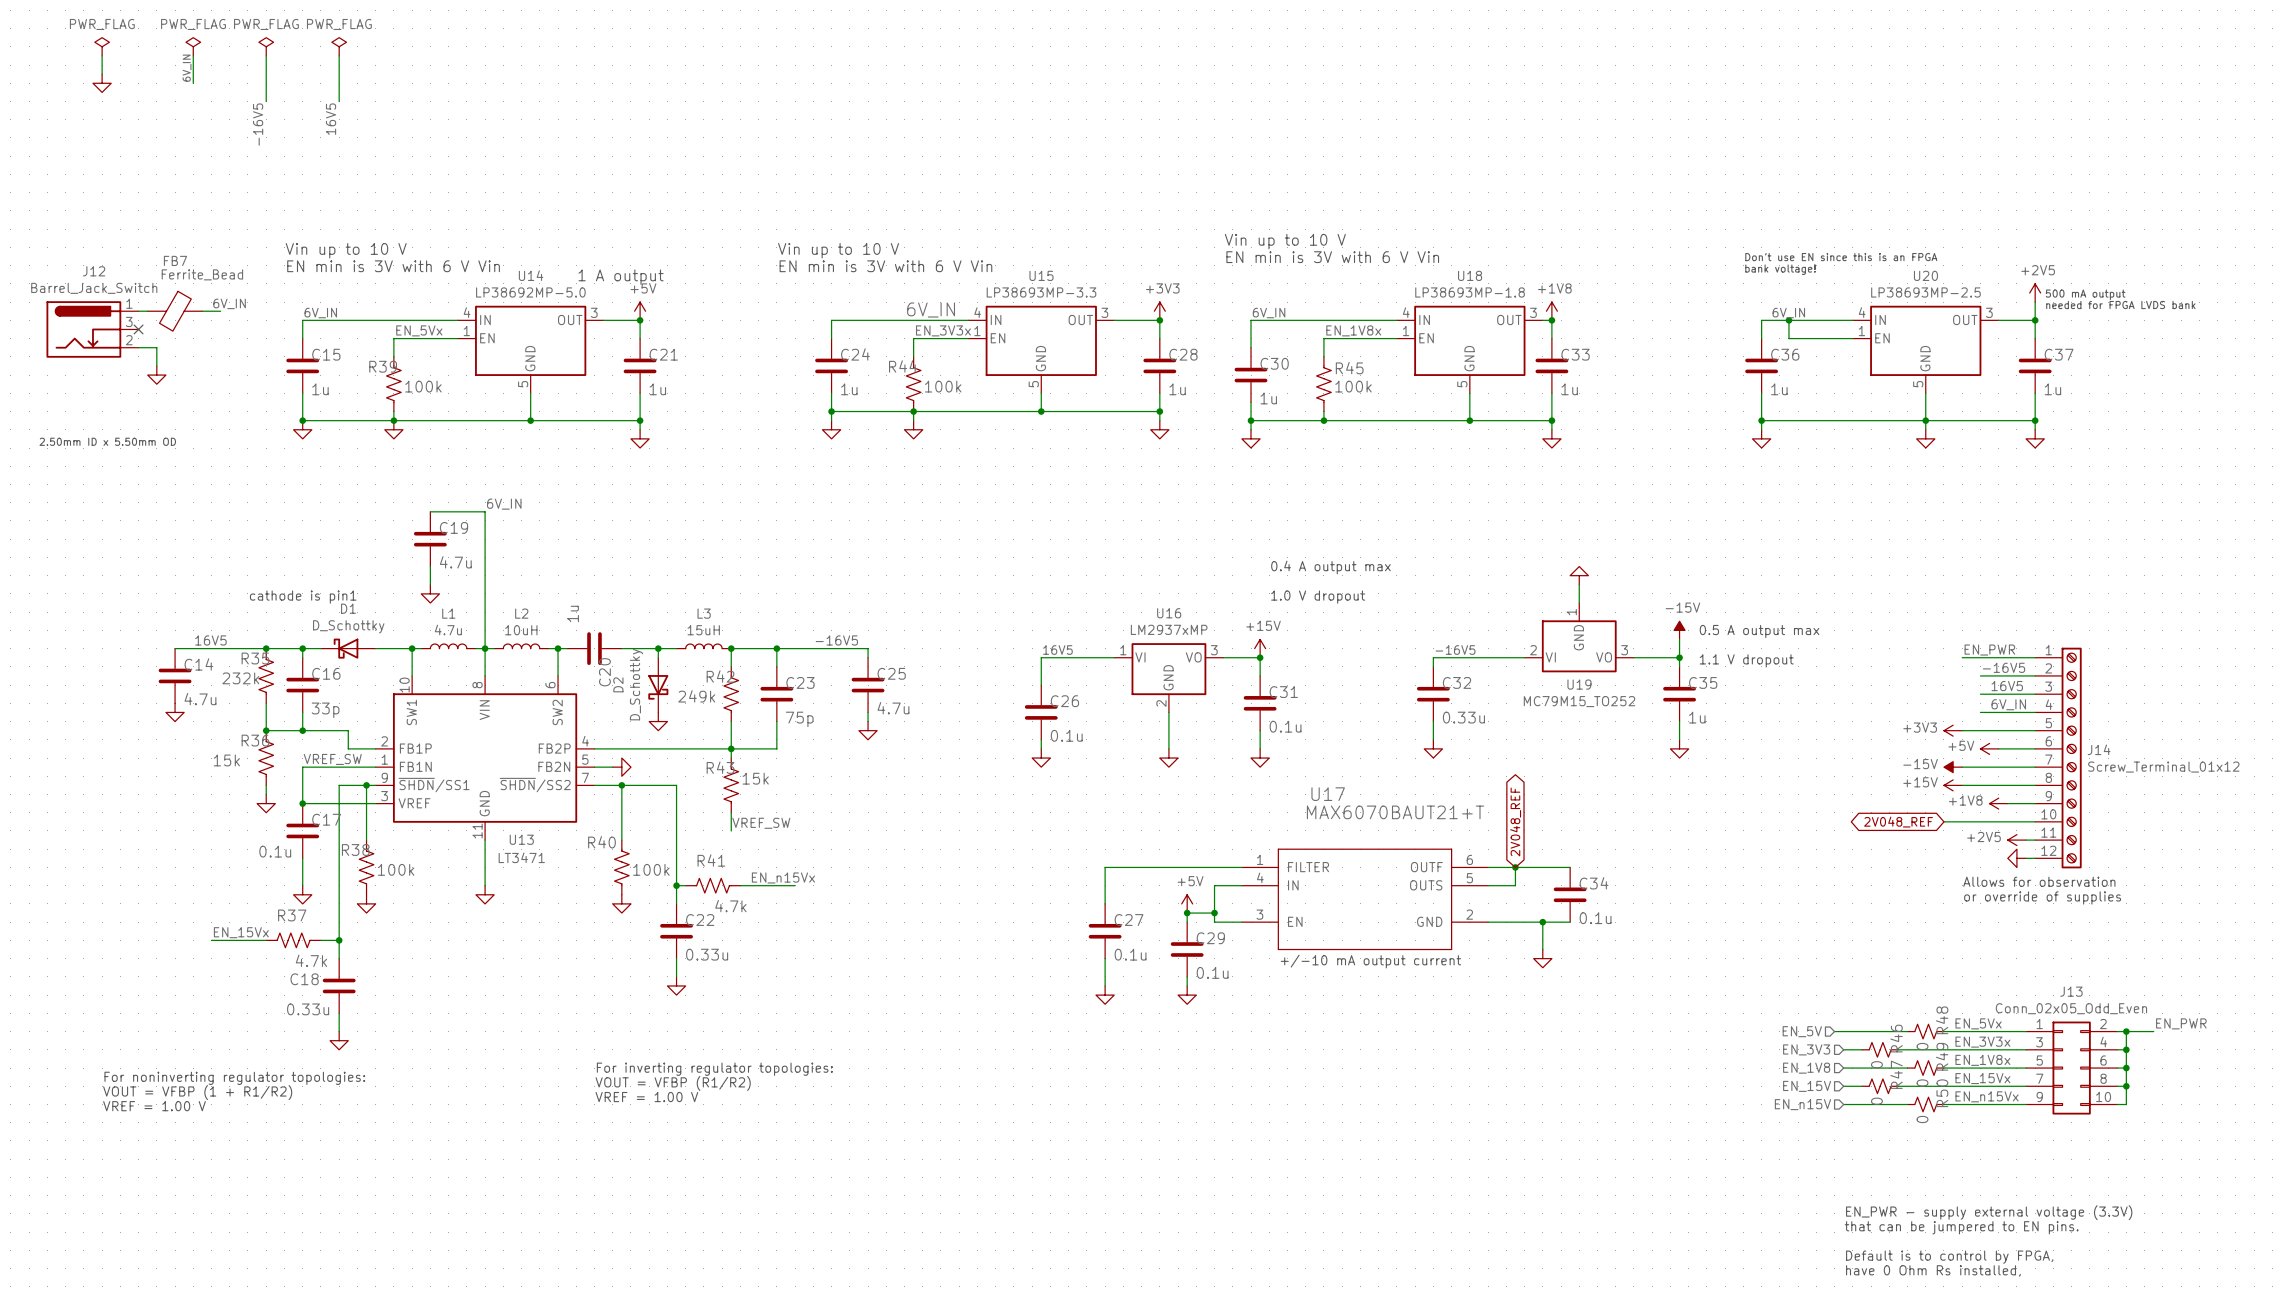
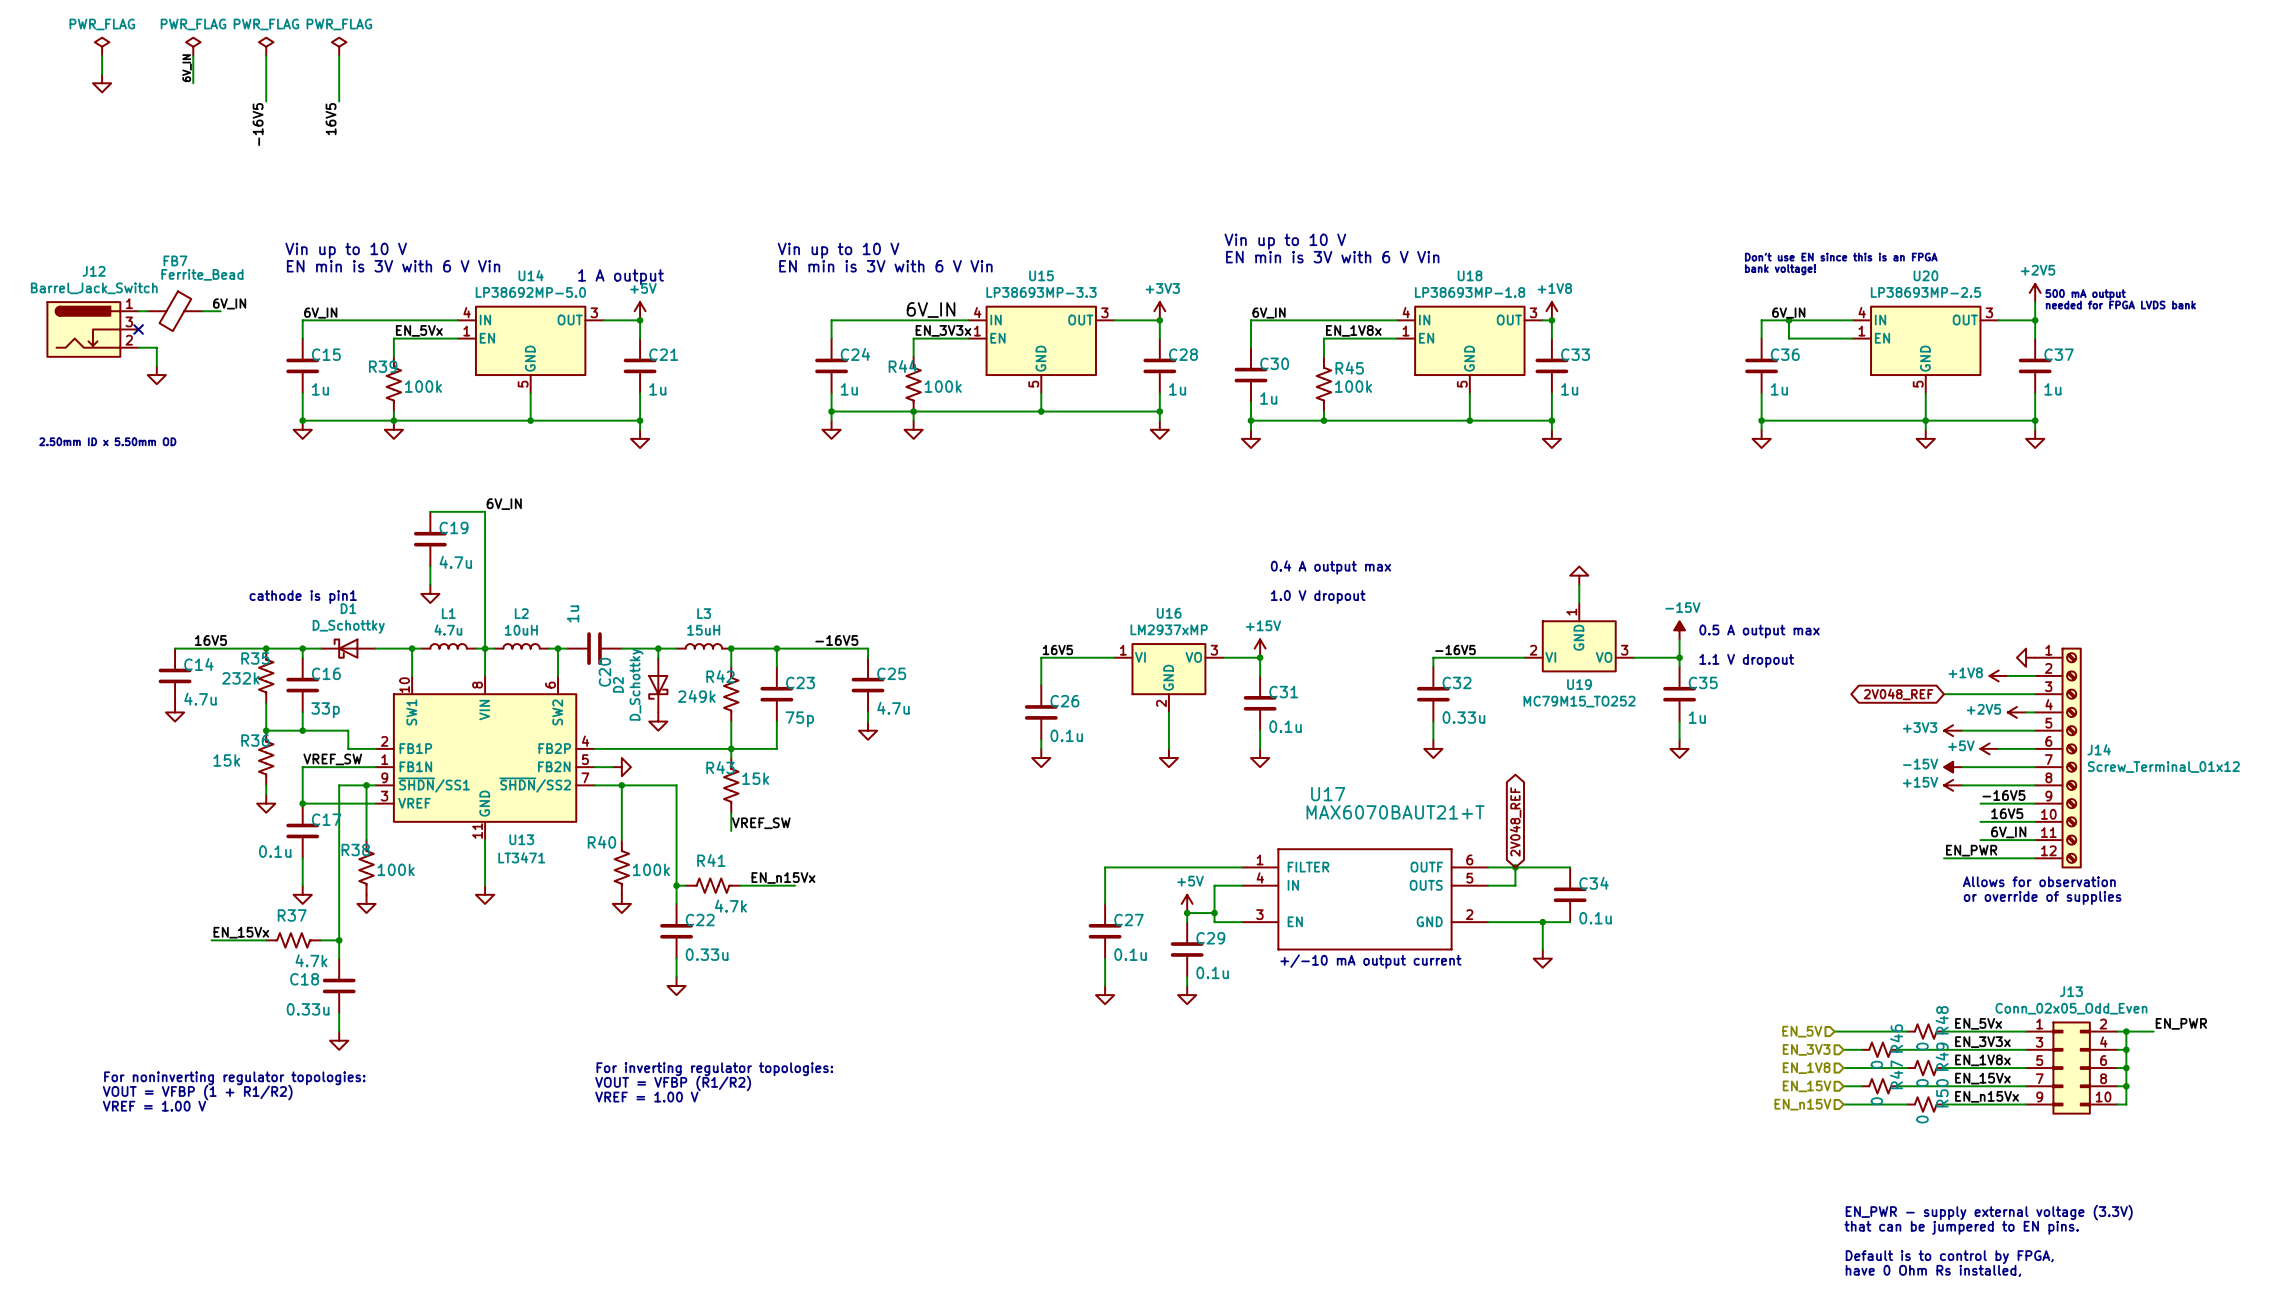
label: EN_PWR (1989, 650) -> none
wire: (1962, 657) (2035, 657) -> none
power symbol: none -> (2026, 657)
label position: -16V5 (2003, 667) -> -16V5 (2003, 795)
label position: 16V5 (2007, 686) -> 16V5 (2007, 813)
label position: 6V_IN (2008, 704) -> 6V_IN (2008, 832)
power symbol position: +1V8 (1998, 803) -> +1V8 (1998, 675)
wire: (1943, 821) (1980, 821) -> (1943, 694) (1980, 694)
global label position: 2V048_REF (1898, 822) -> 2V048_REF (1898, 694)
power symbol position: +2V5 (2016, 840) -> +2V5 (2016, 712)
label: none -> EN_PWR (1971, 850)
wire: none -> (1943, 858) (2026, 858)
power symbol: (2016, 858) -> none

